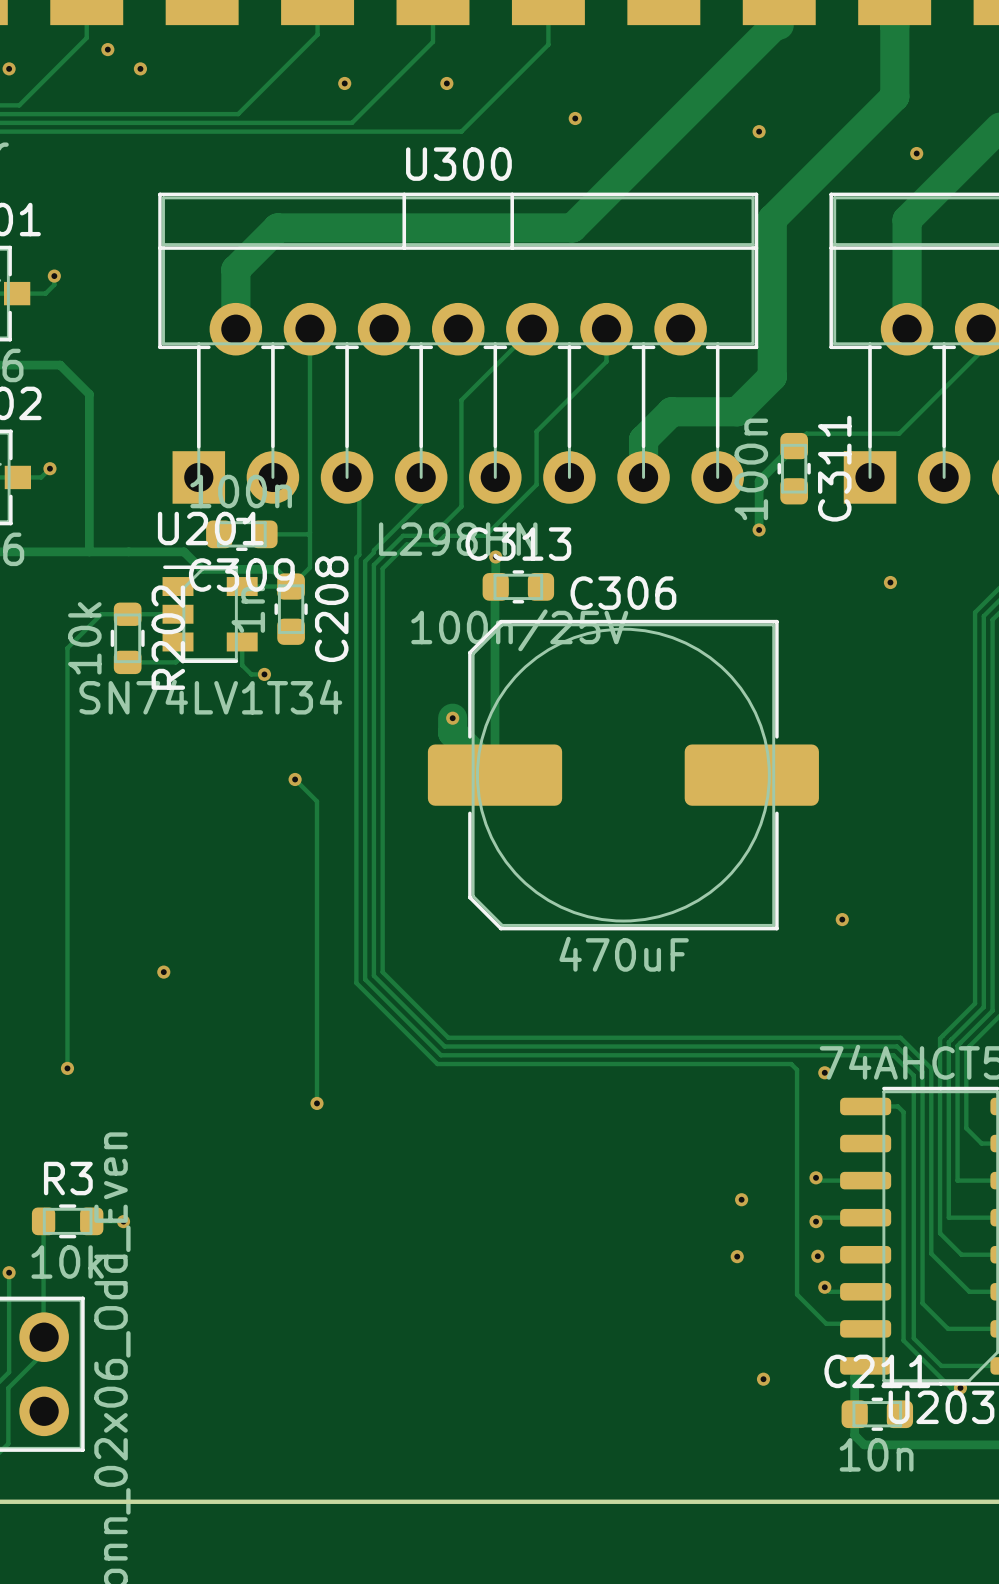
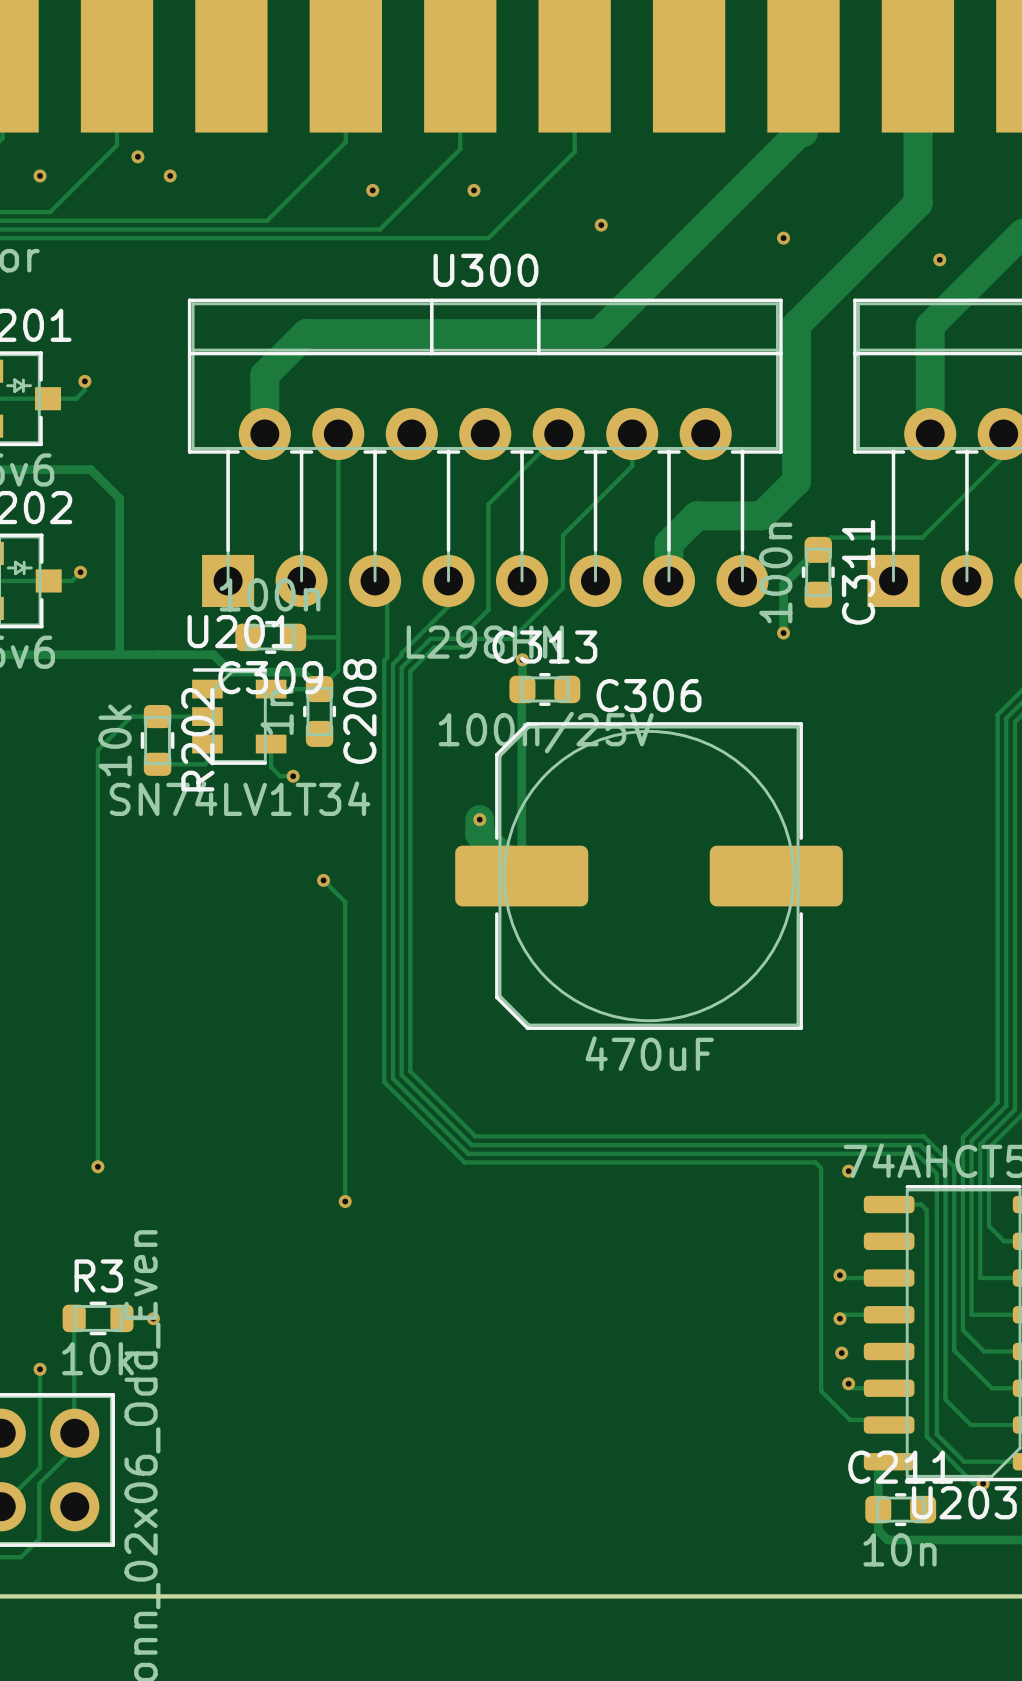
via: (890, 582) -> none
via: (842, 919) -> none
via: (163, 972) -> none
via: (741, 1199) -> none
via: (737, 1256) -> none
via: (763, 1379) -> none

